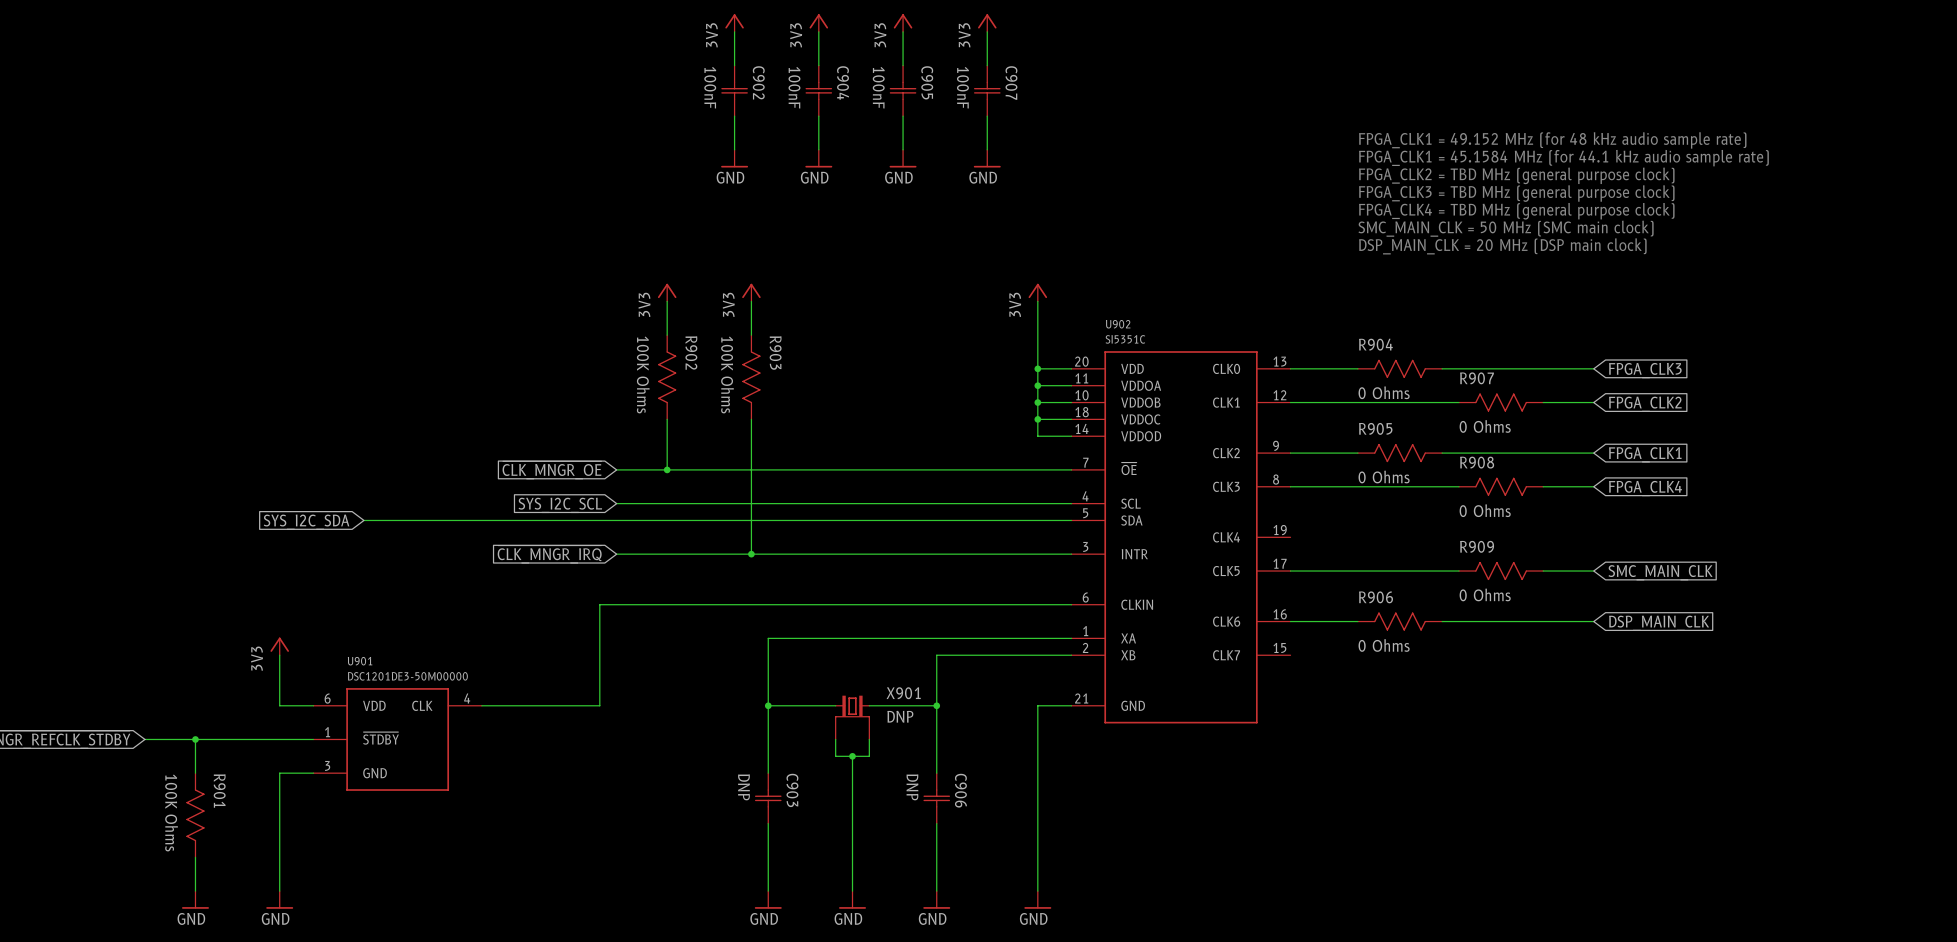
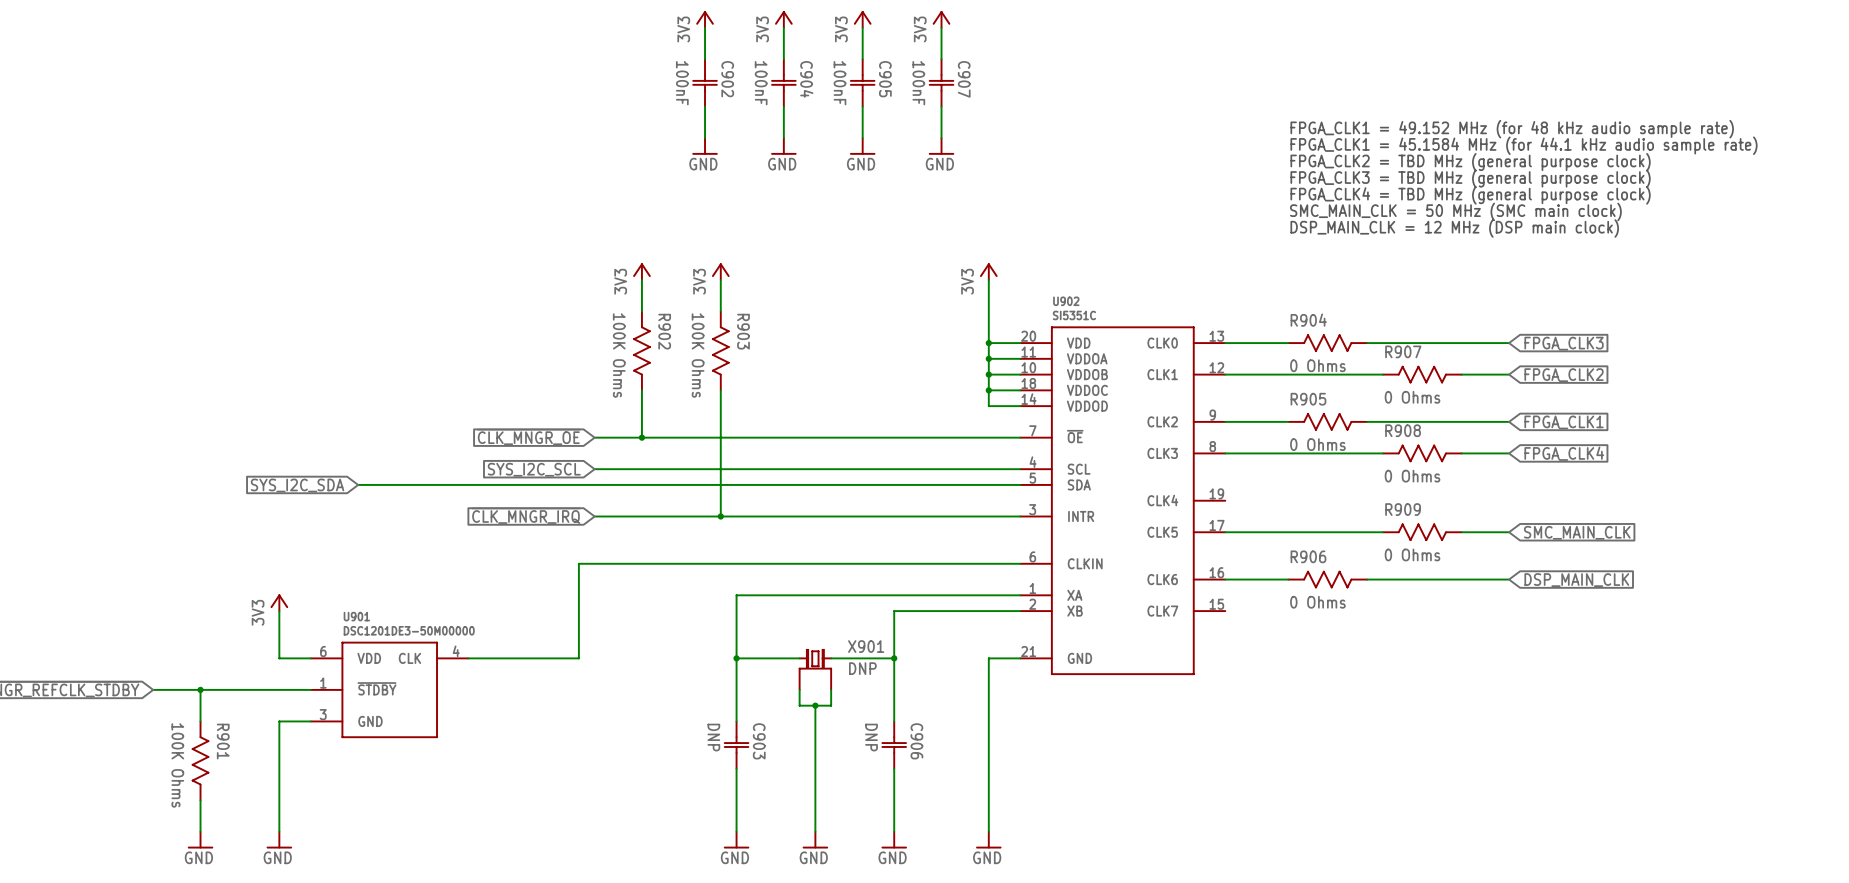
text: DSP_MAIN_CLK = 20 MHz (DSP main clock) (1502, 246) -> DSP_MAIN_CLK = 12 MHz (DSP main clock) (1454, 228)

